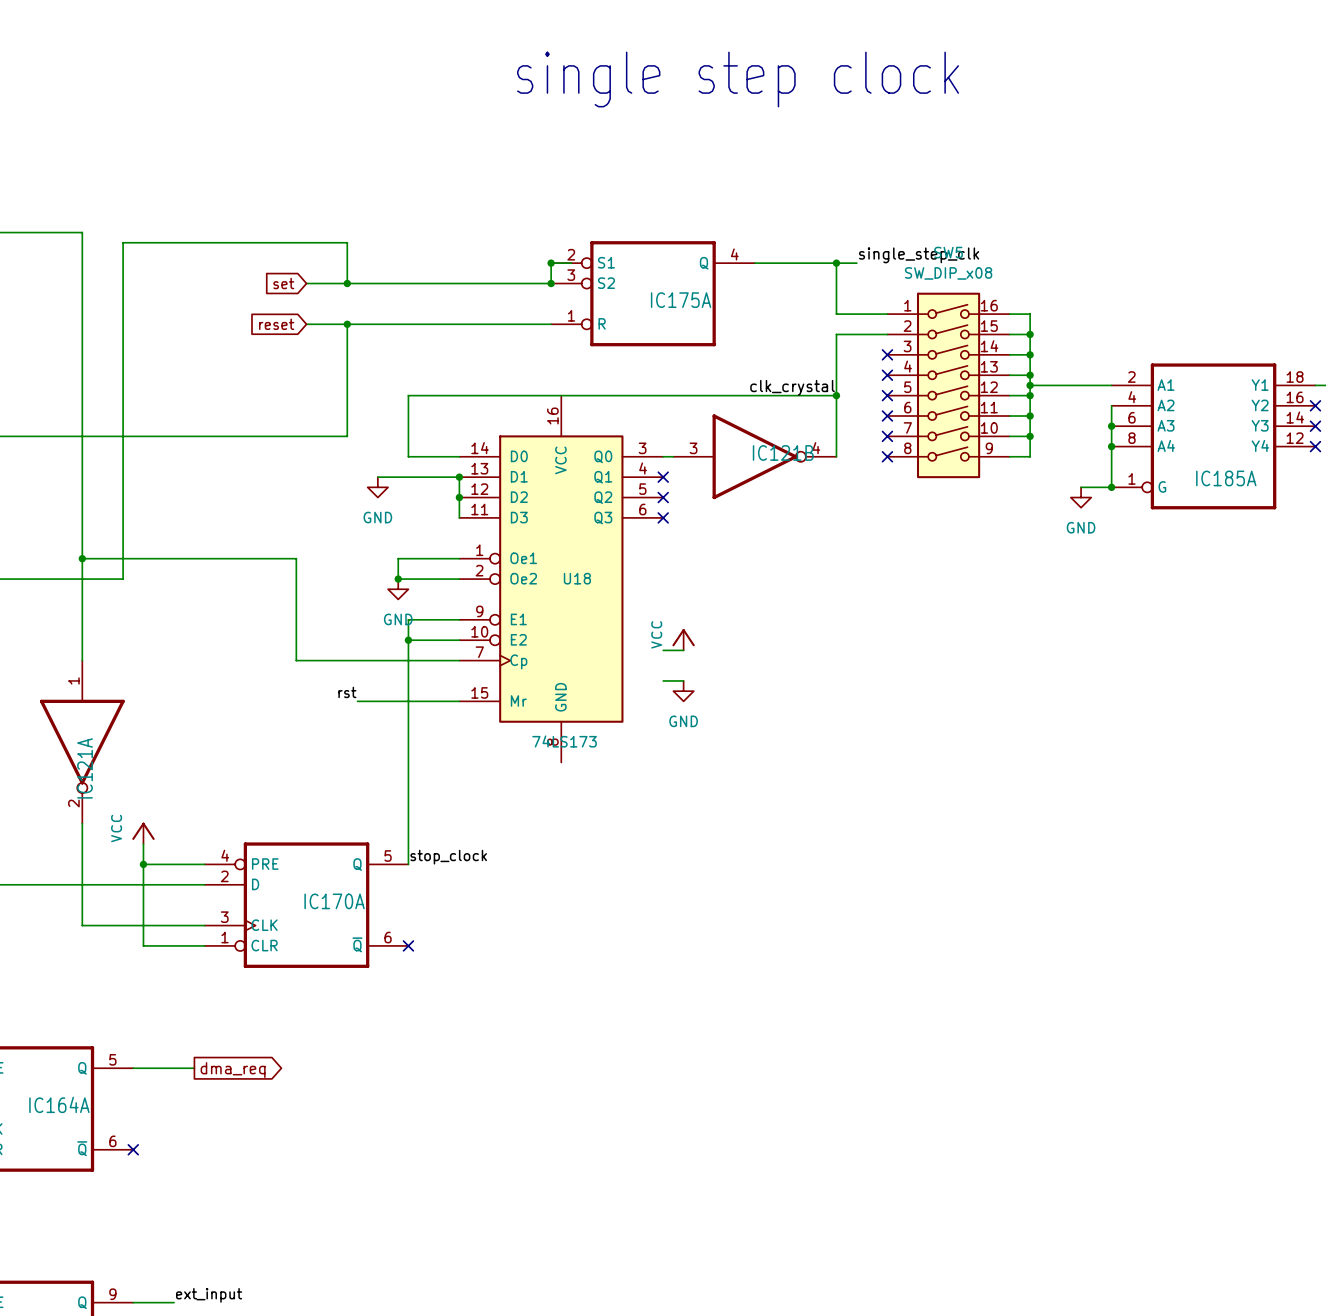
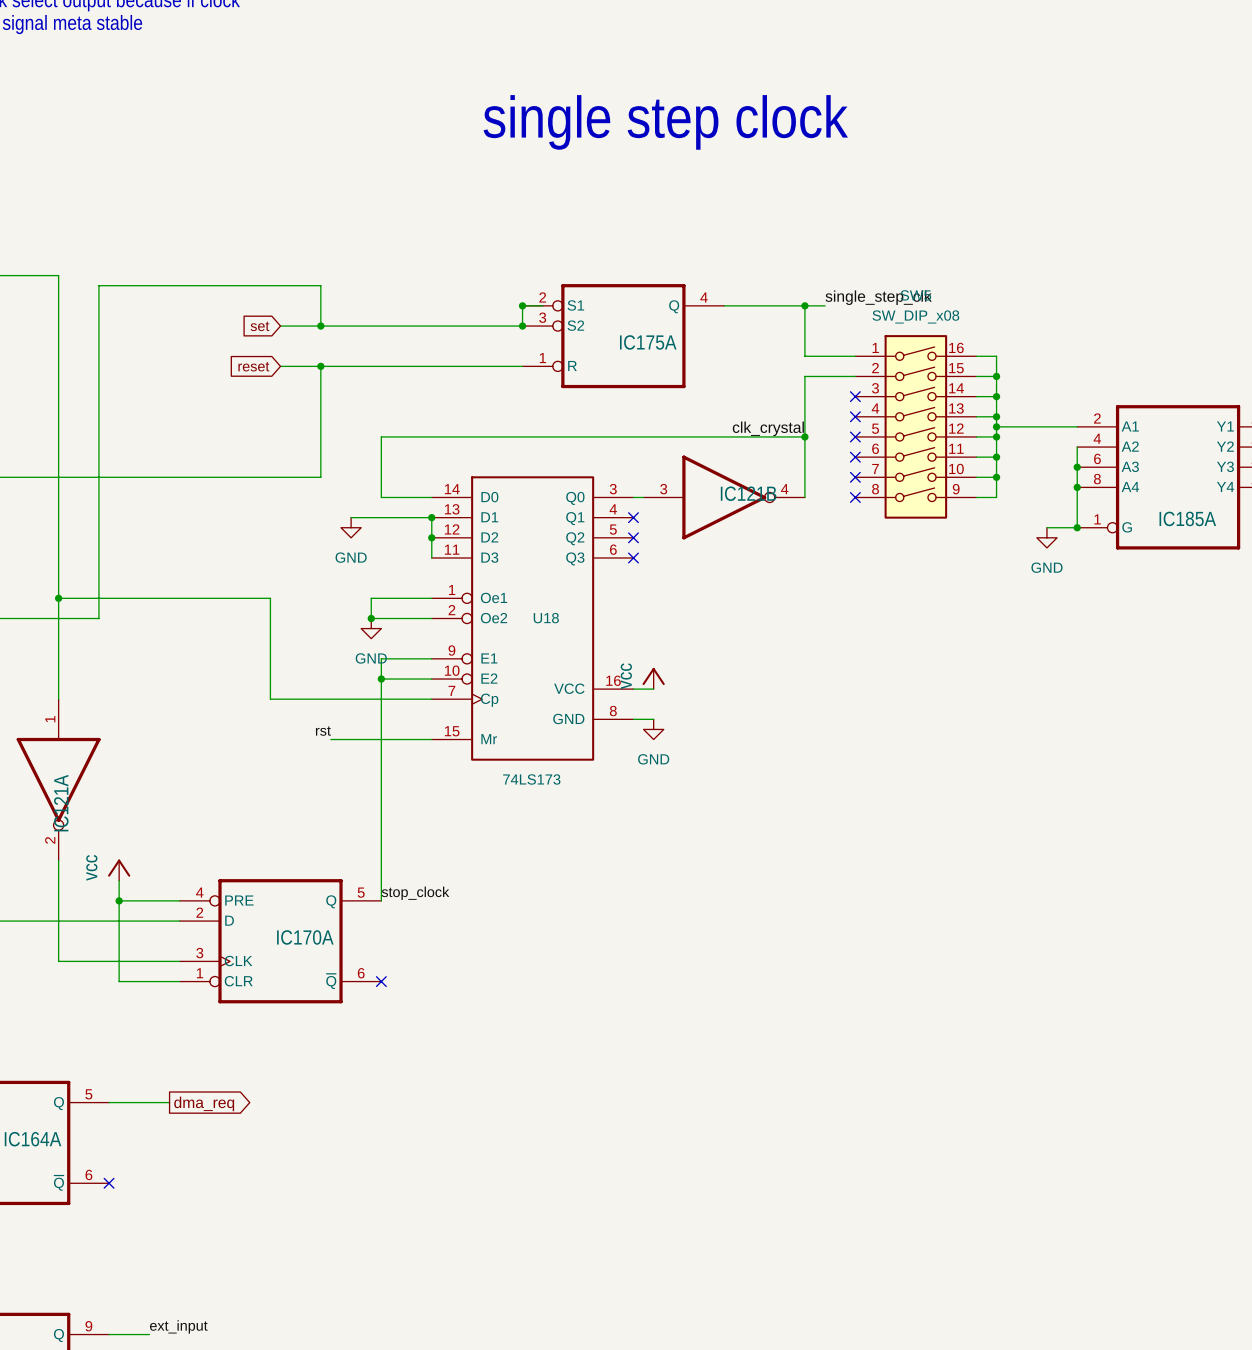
U18 symbol: [459, 395, 664, 763] -> [431, 476, 634, 761]

